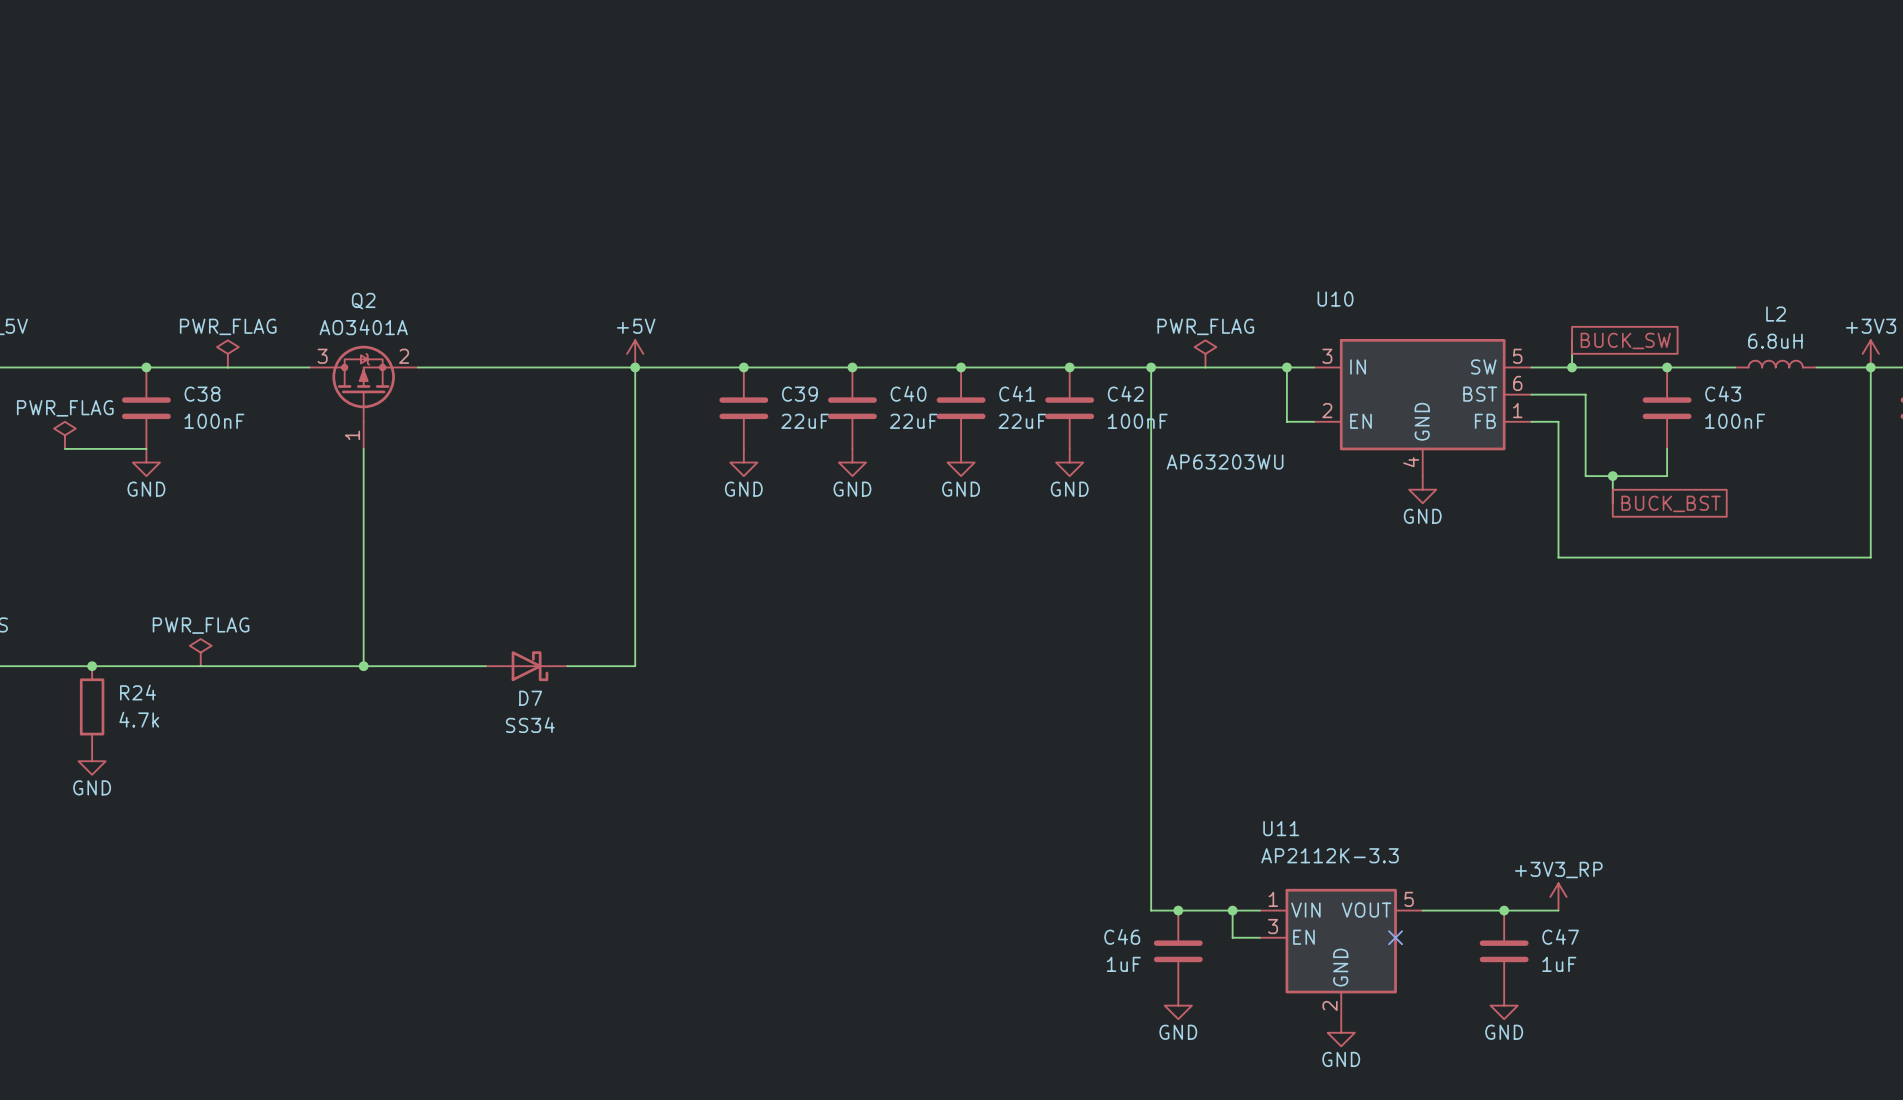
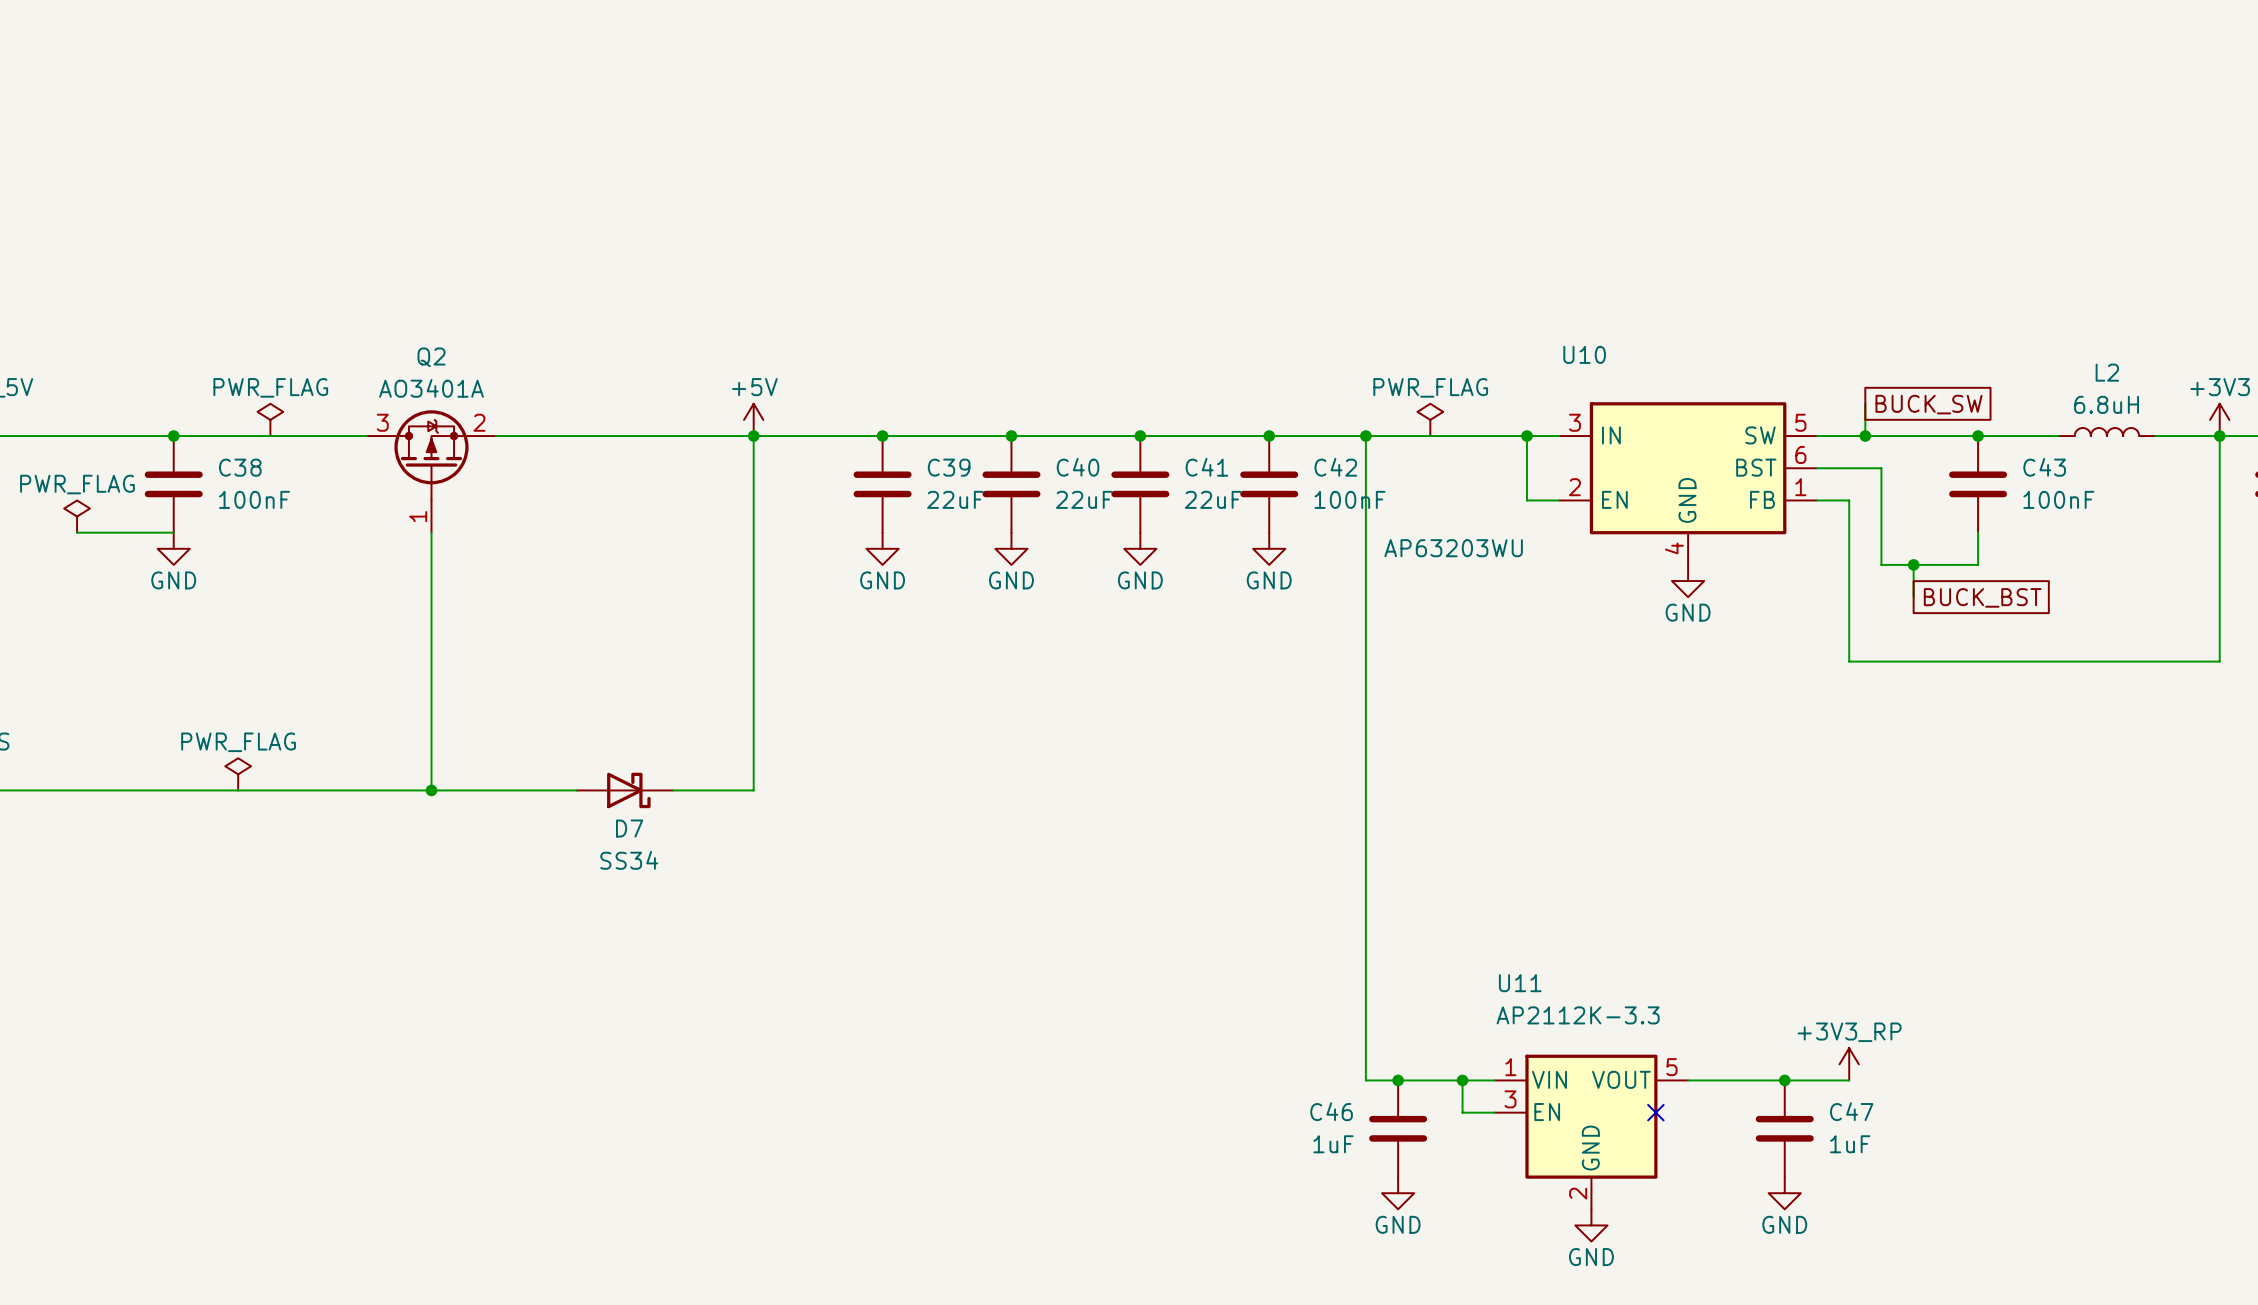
junction: (92, 666) -> none
R24: 4.7k (92, 706) -> none
power symbol: GND (92, 761) -> none

